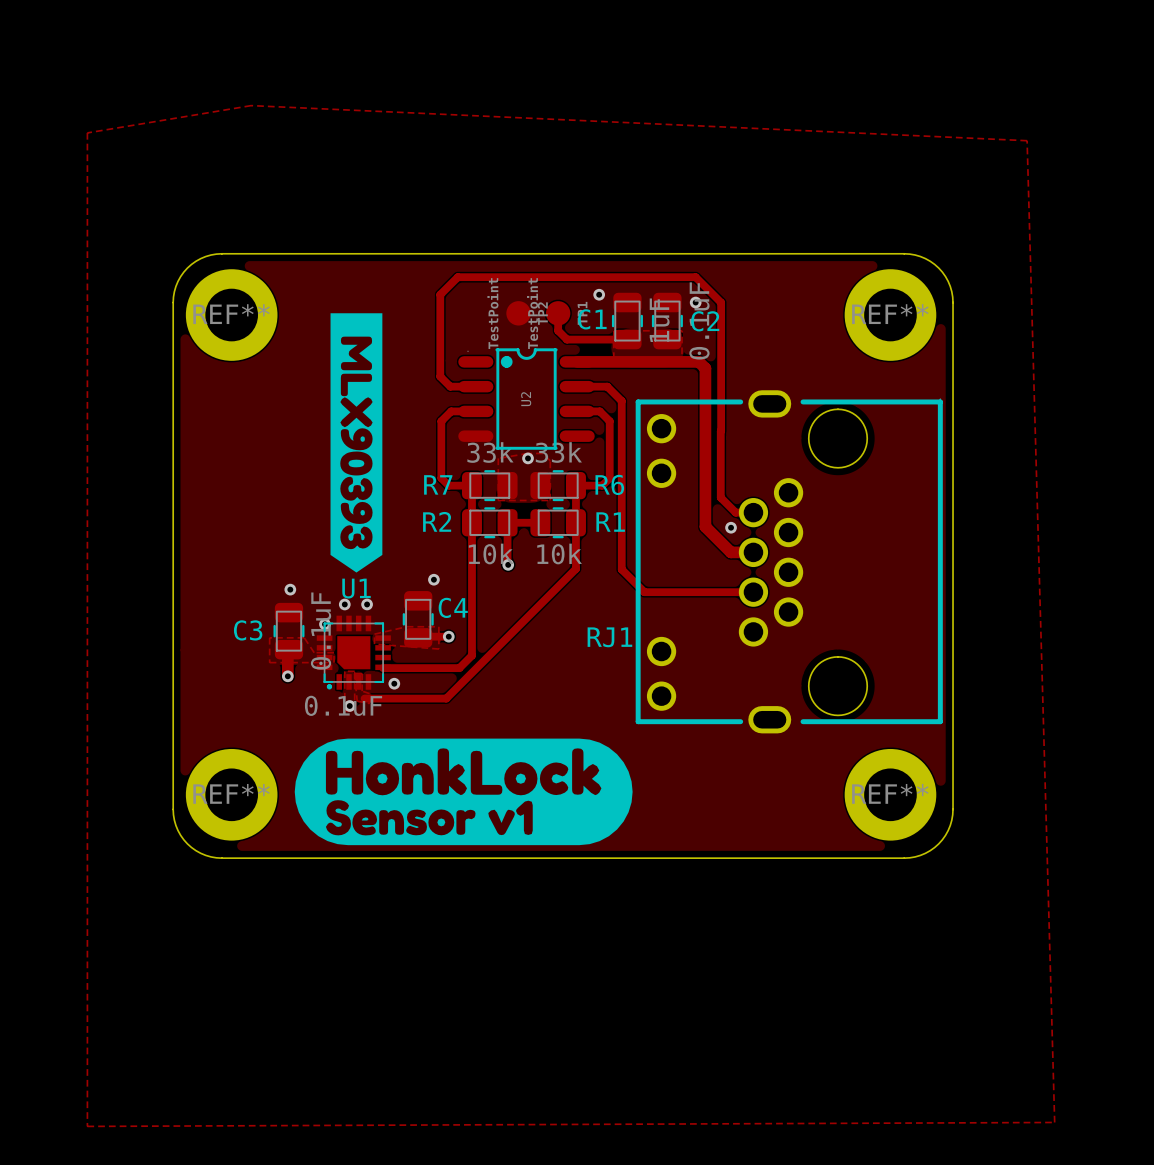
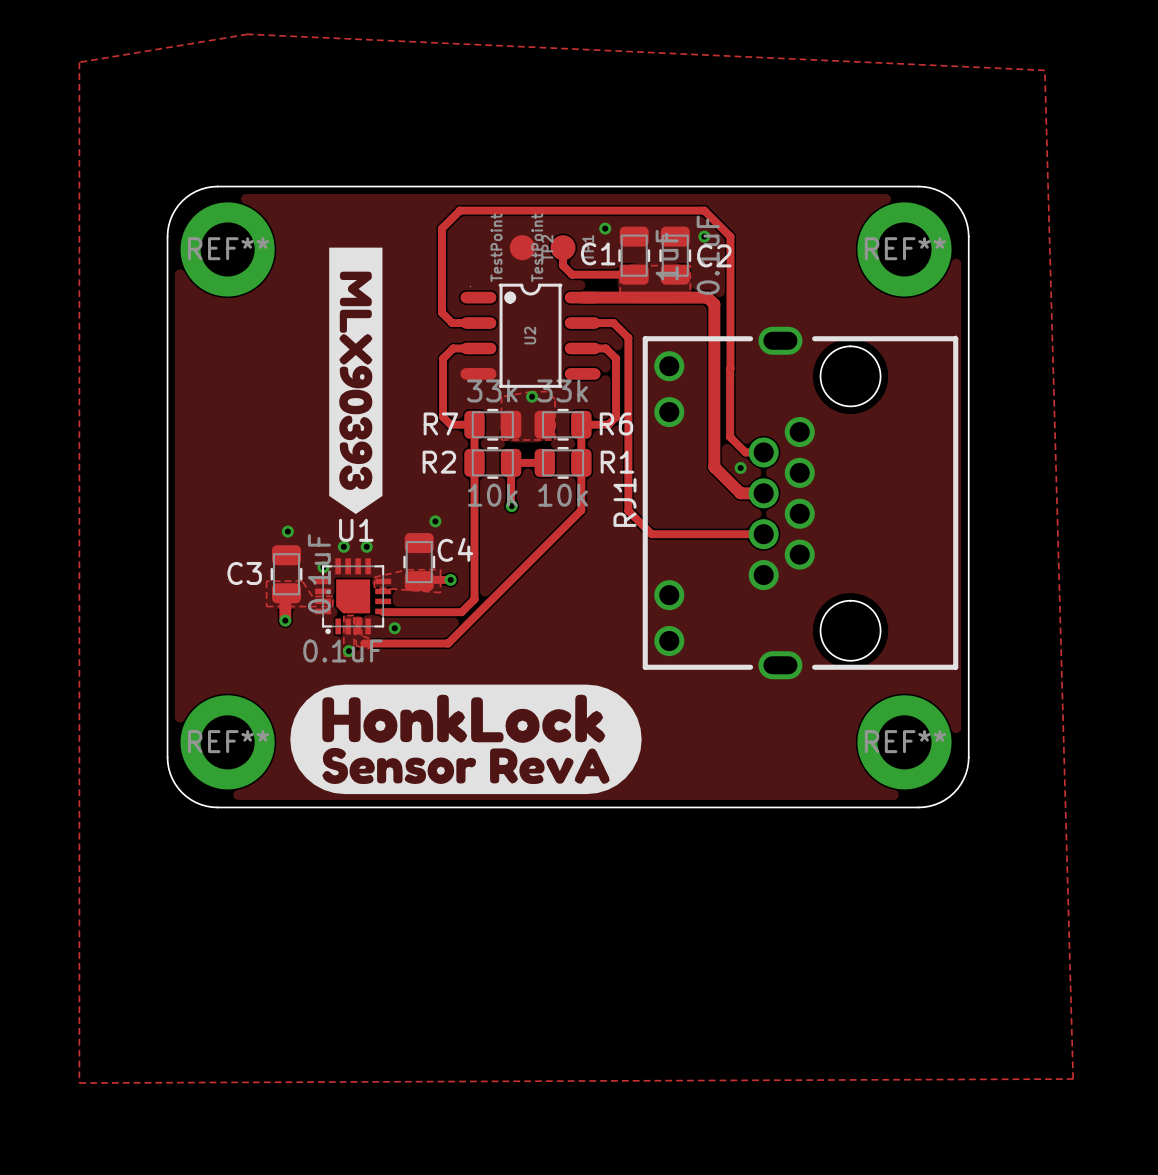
RJ1 name rotation: 0° (609, 637) -> 90° counterclockwise (624, 502)
RJ1 name position: RJ1 (609, 637) -> RJ1 (624, 502)
drawing shape: [294, 738, 633, 846] -> [290, 684, 642, 795]

